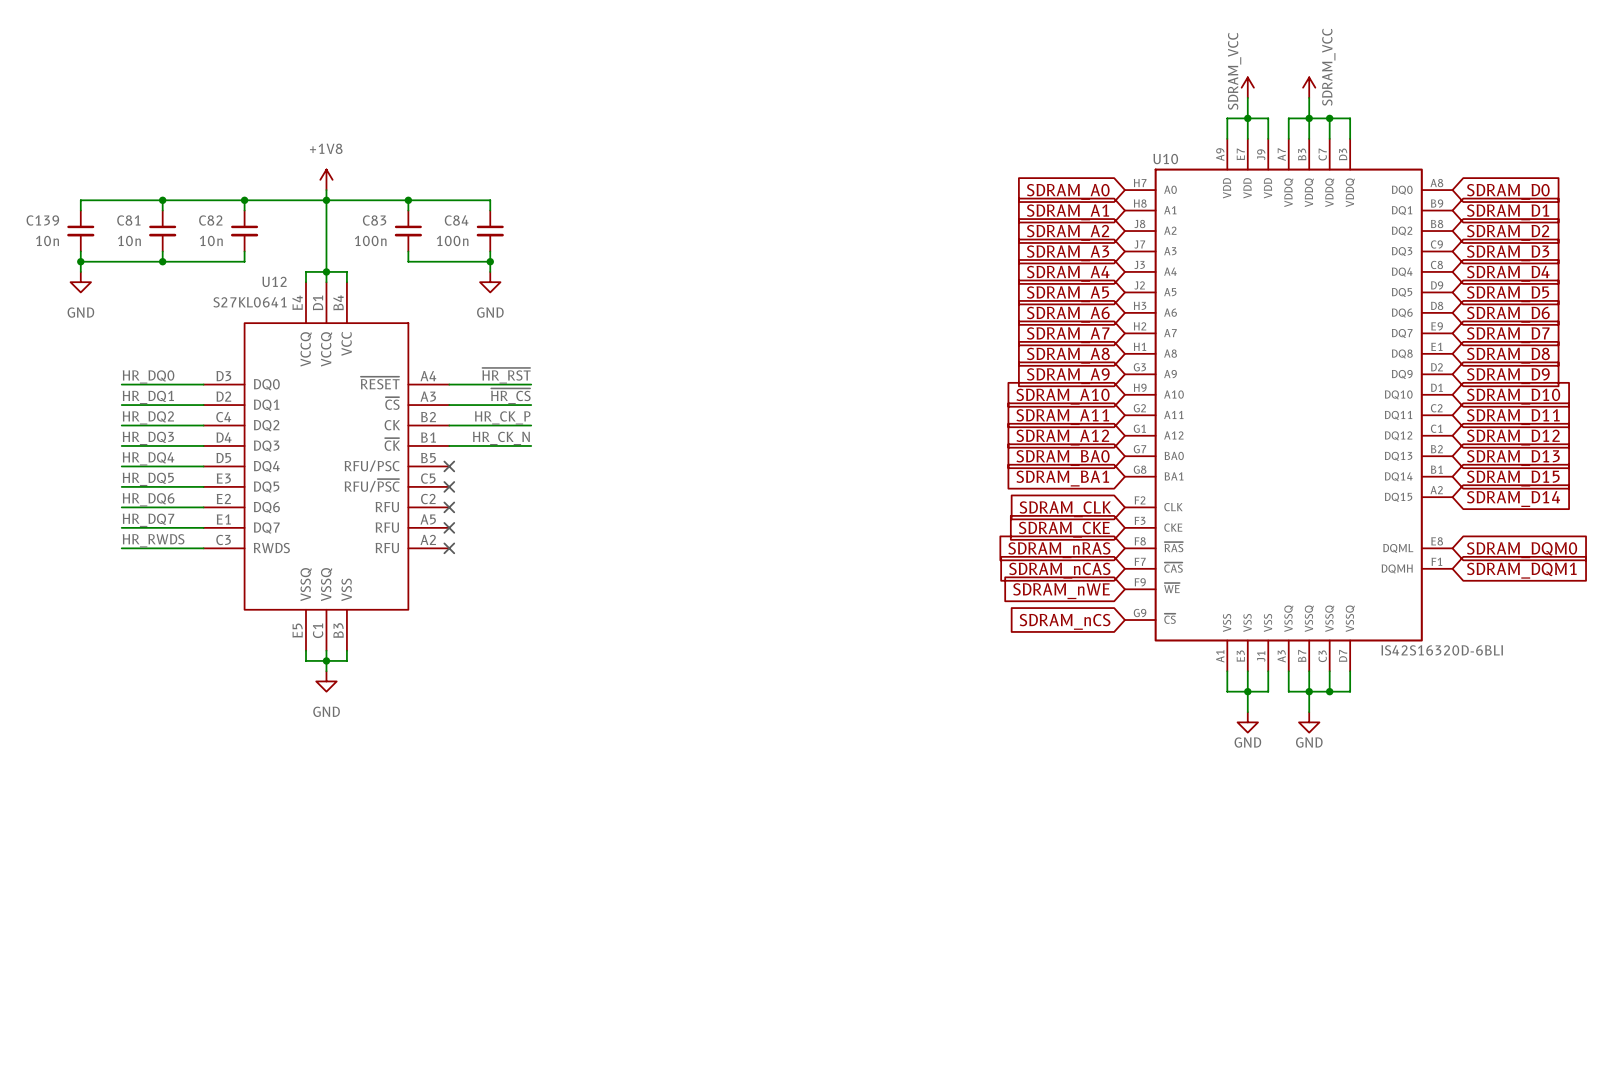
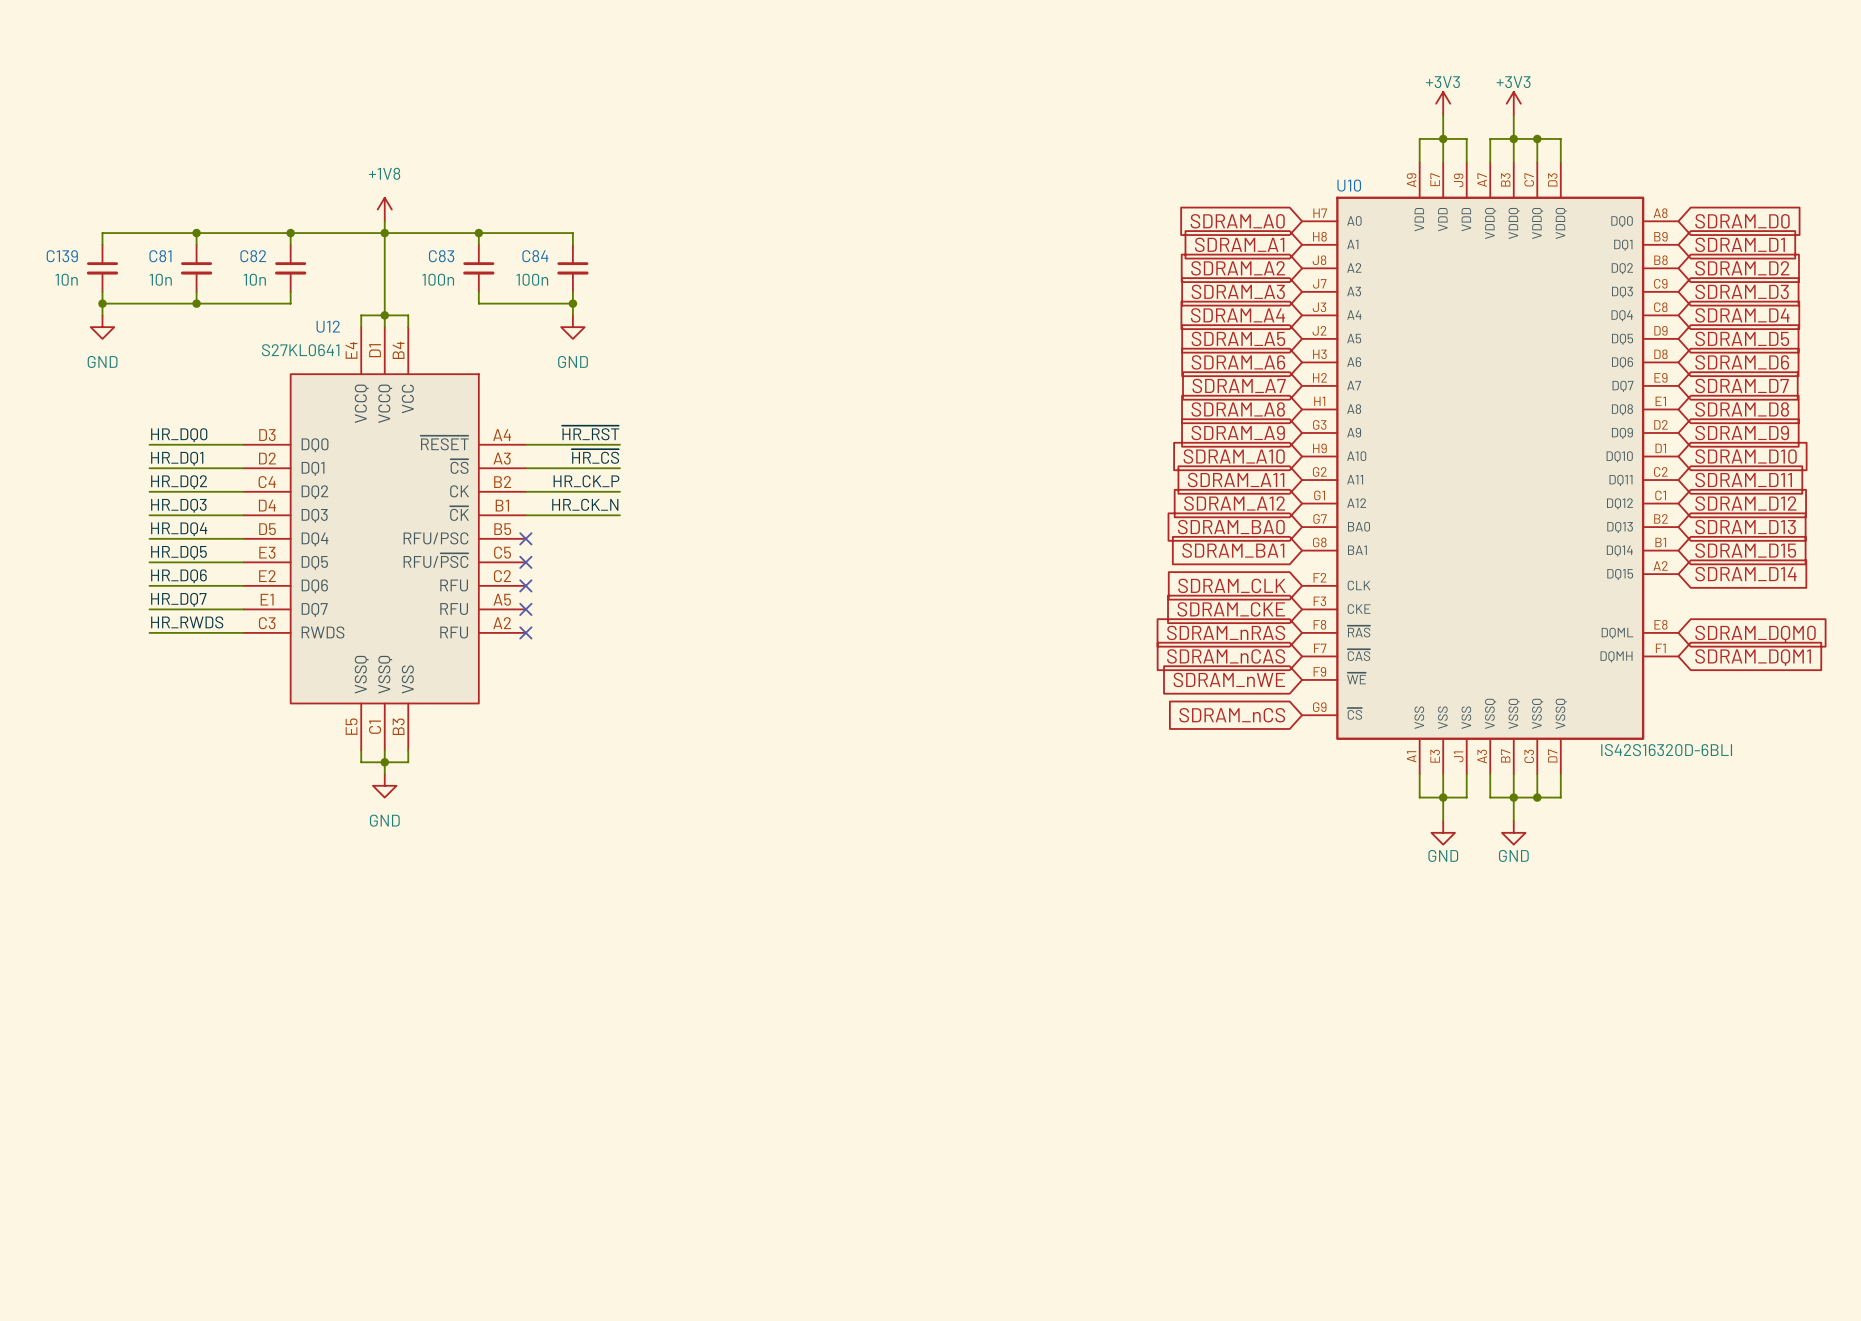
power symbol: SDRAM_VCC (1247, 87) -> +3V3 (1443, 103)
power symbol: SDRAM_VCC (1309, 87) -> +3V3 (1513, 103)

